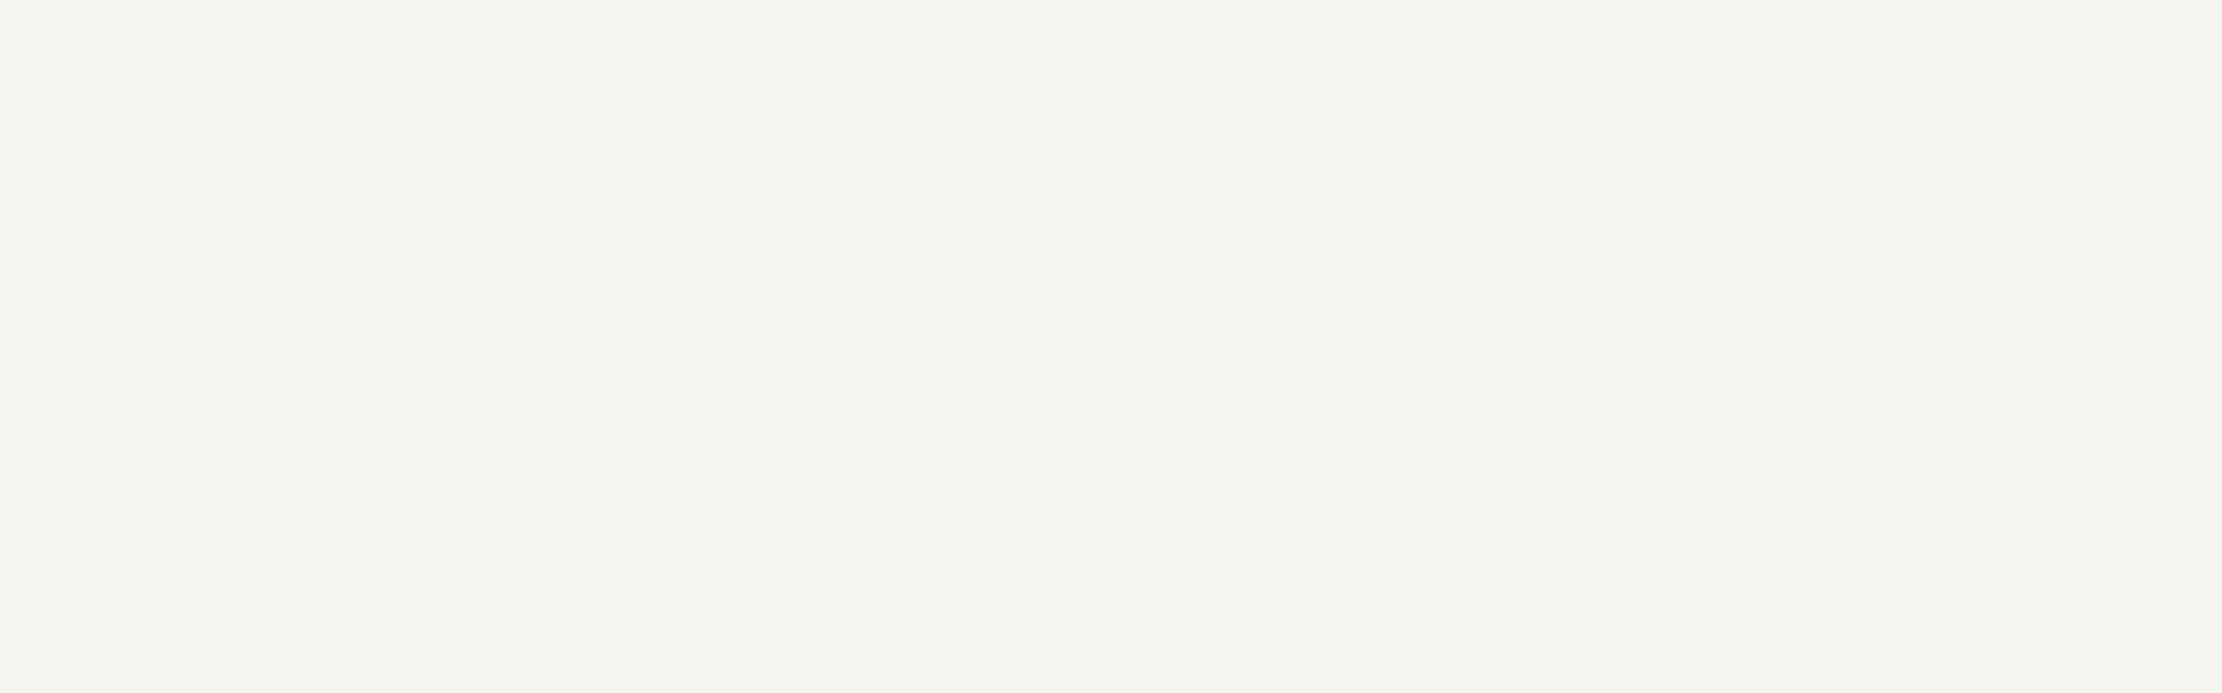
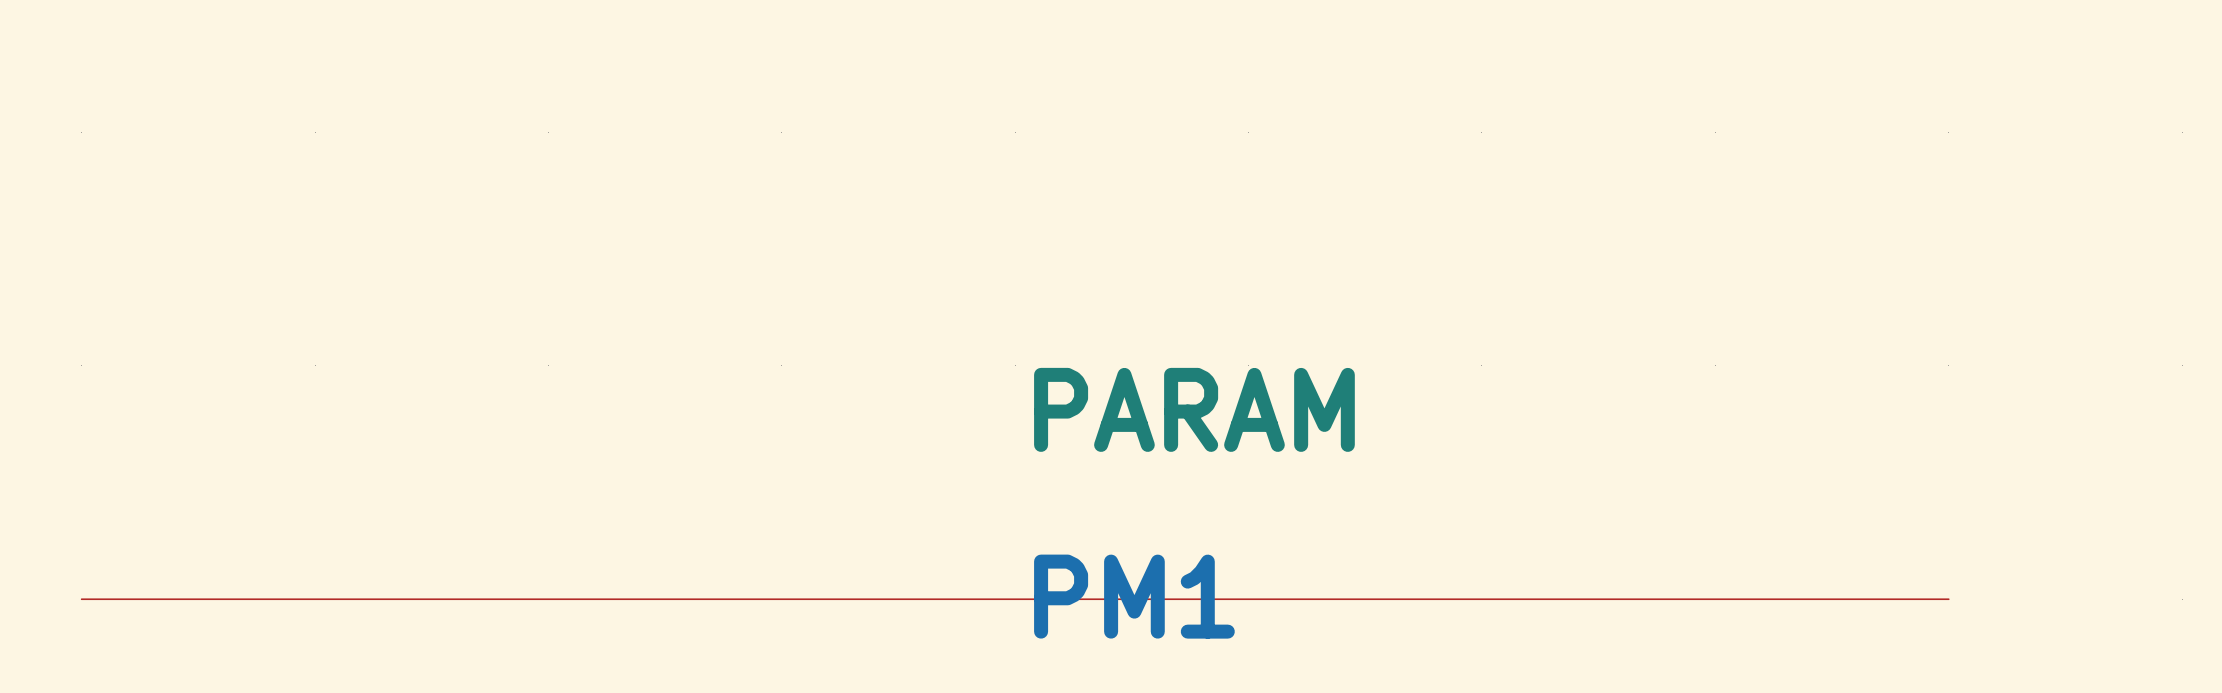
PM1: none -> PARAM (1015, 599)

